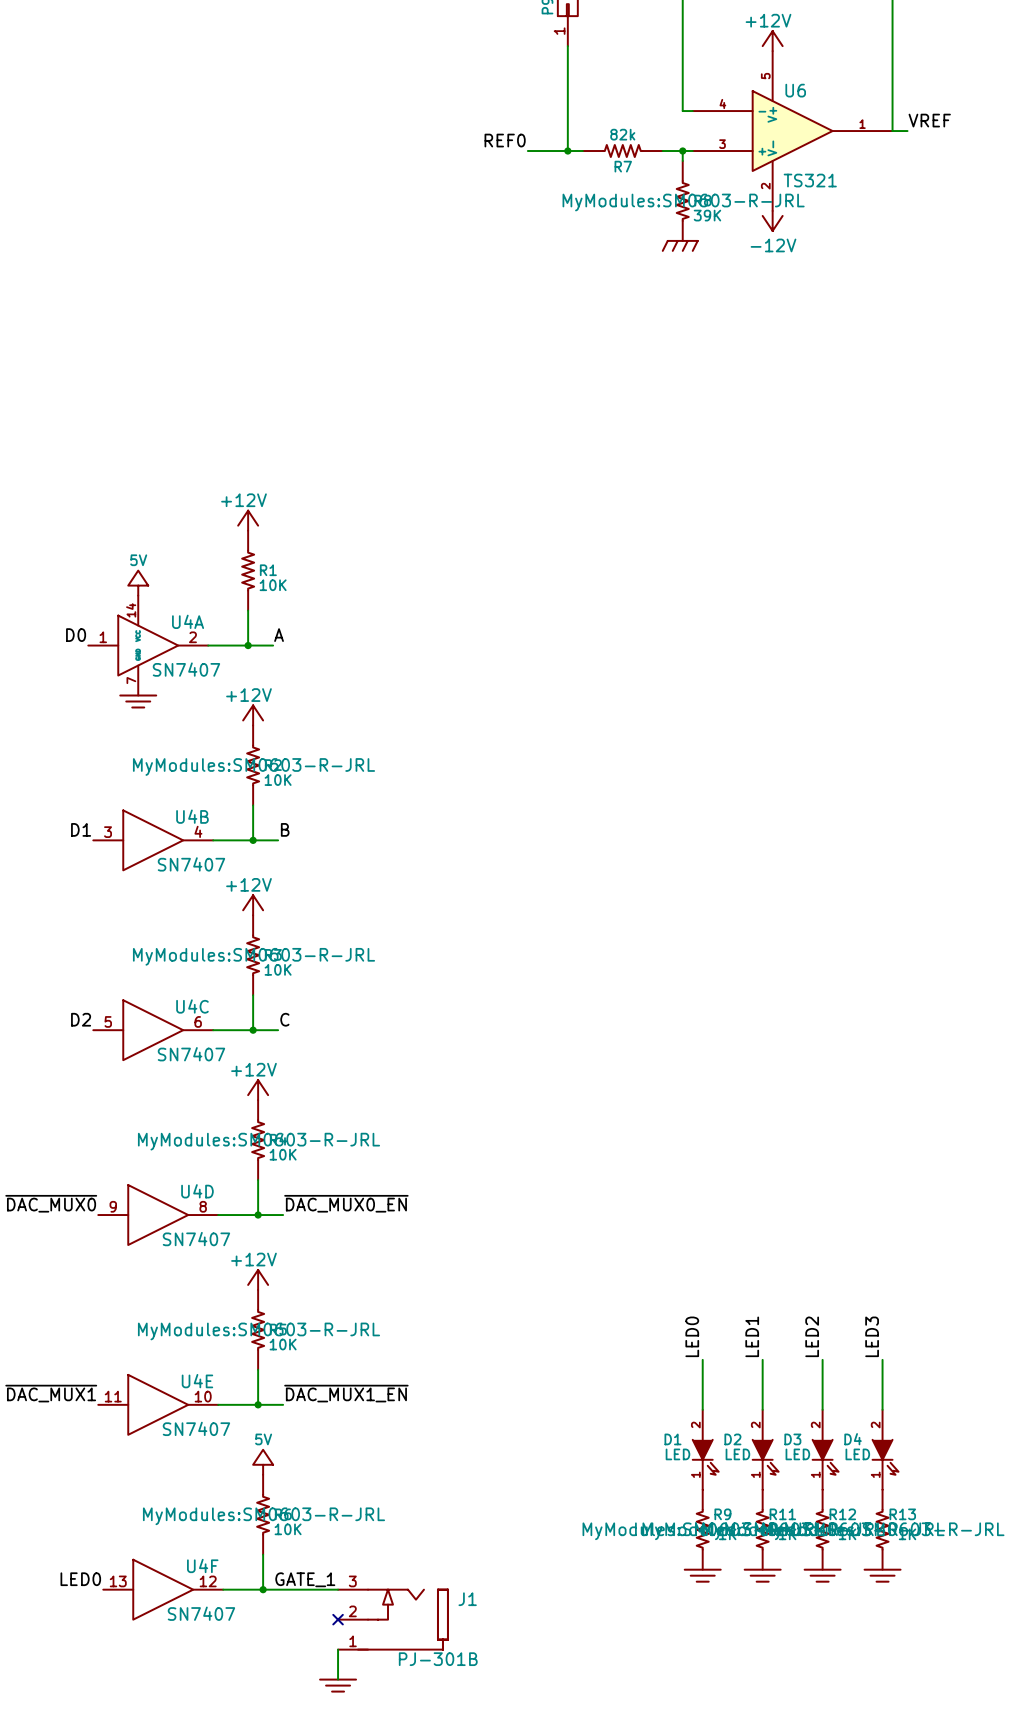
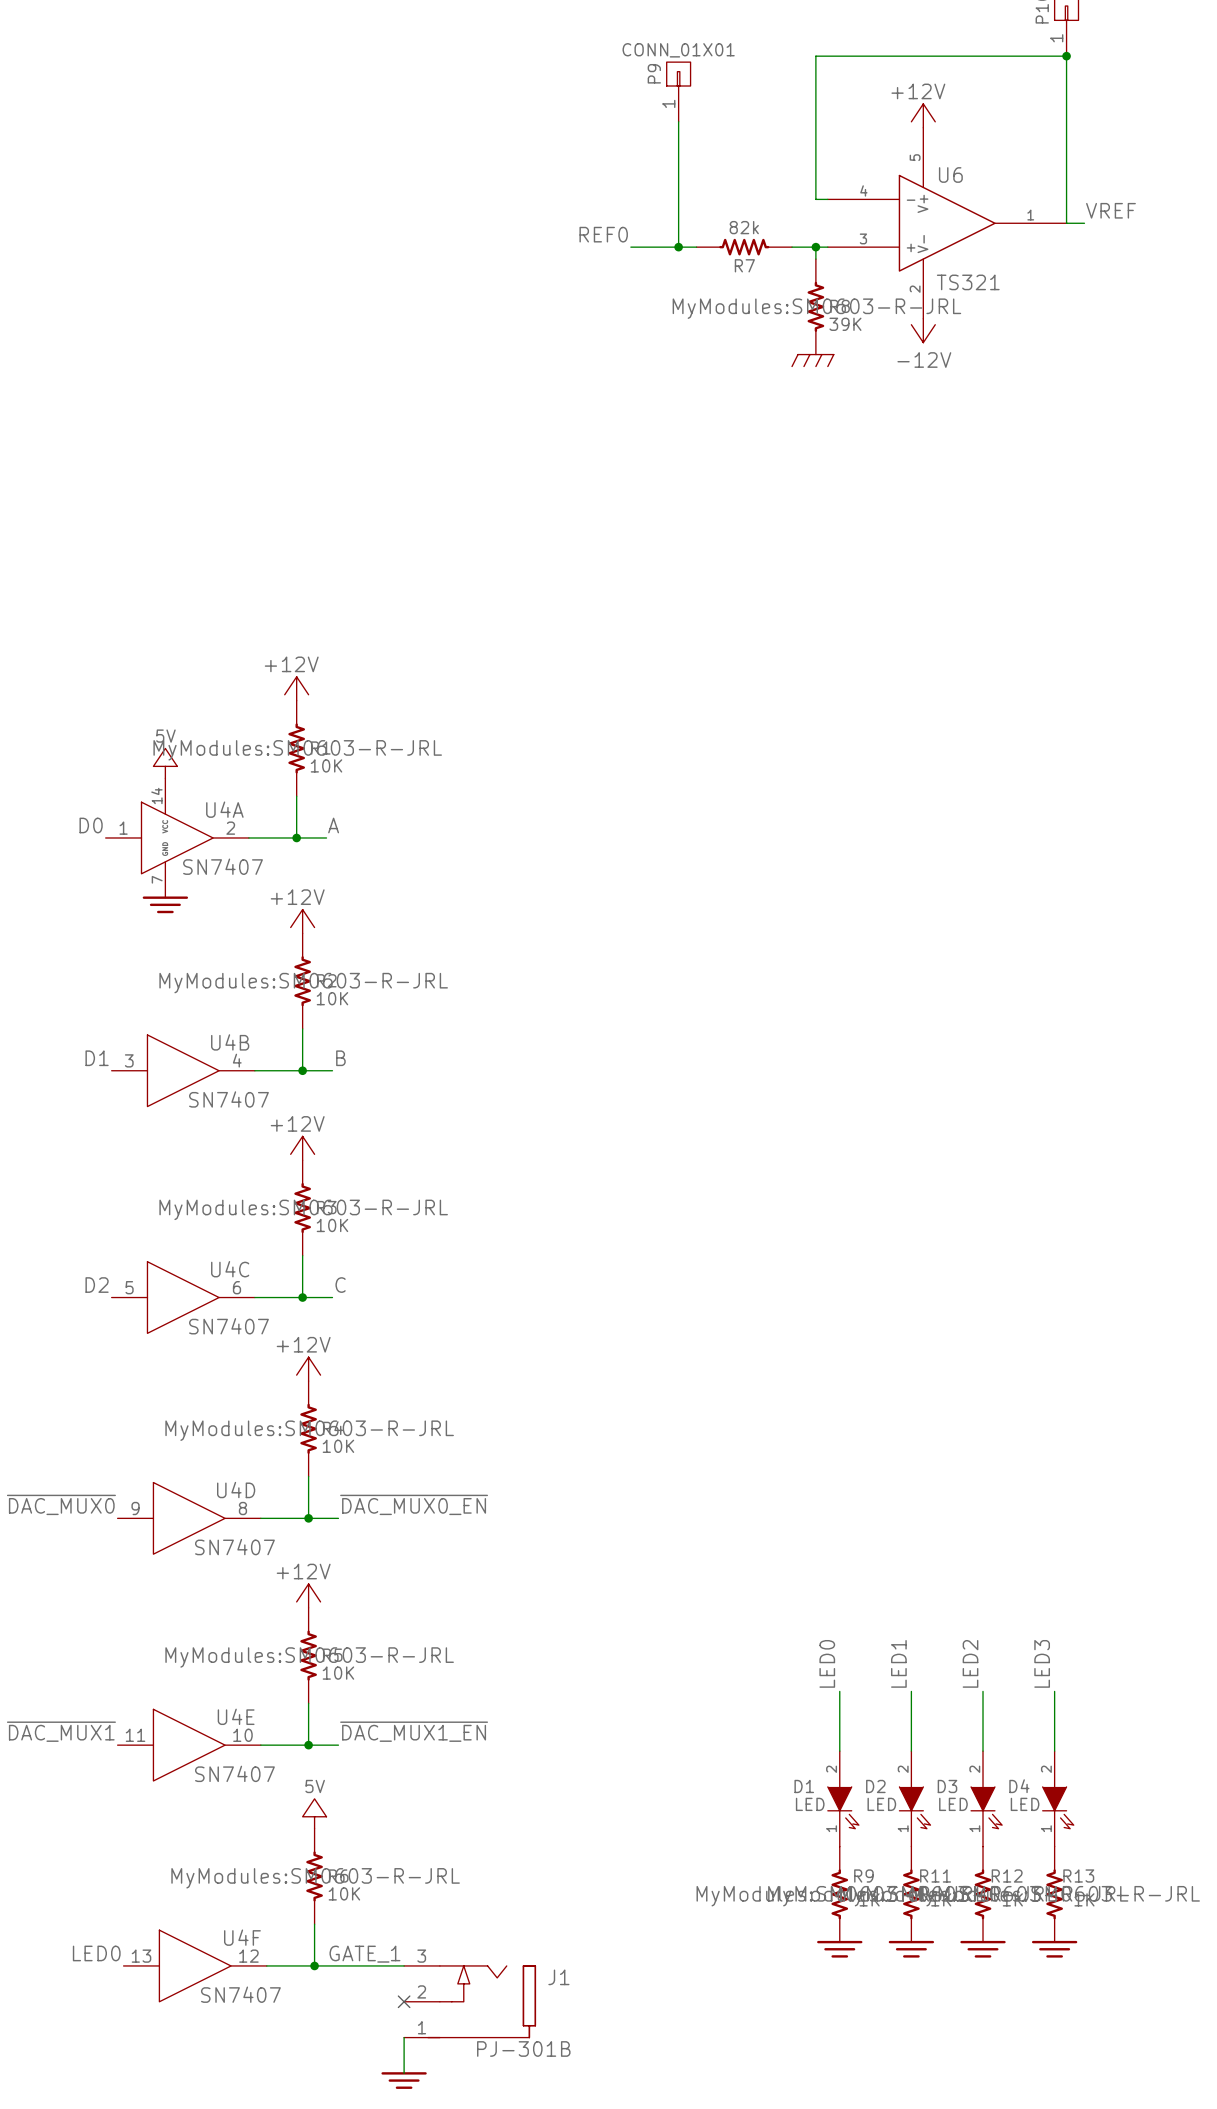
R1 text: none -> MyModules:SM0603-R-JRL (297, 750)

